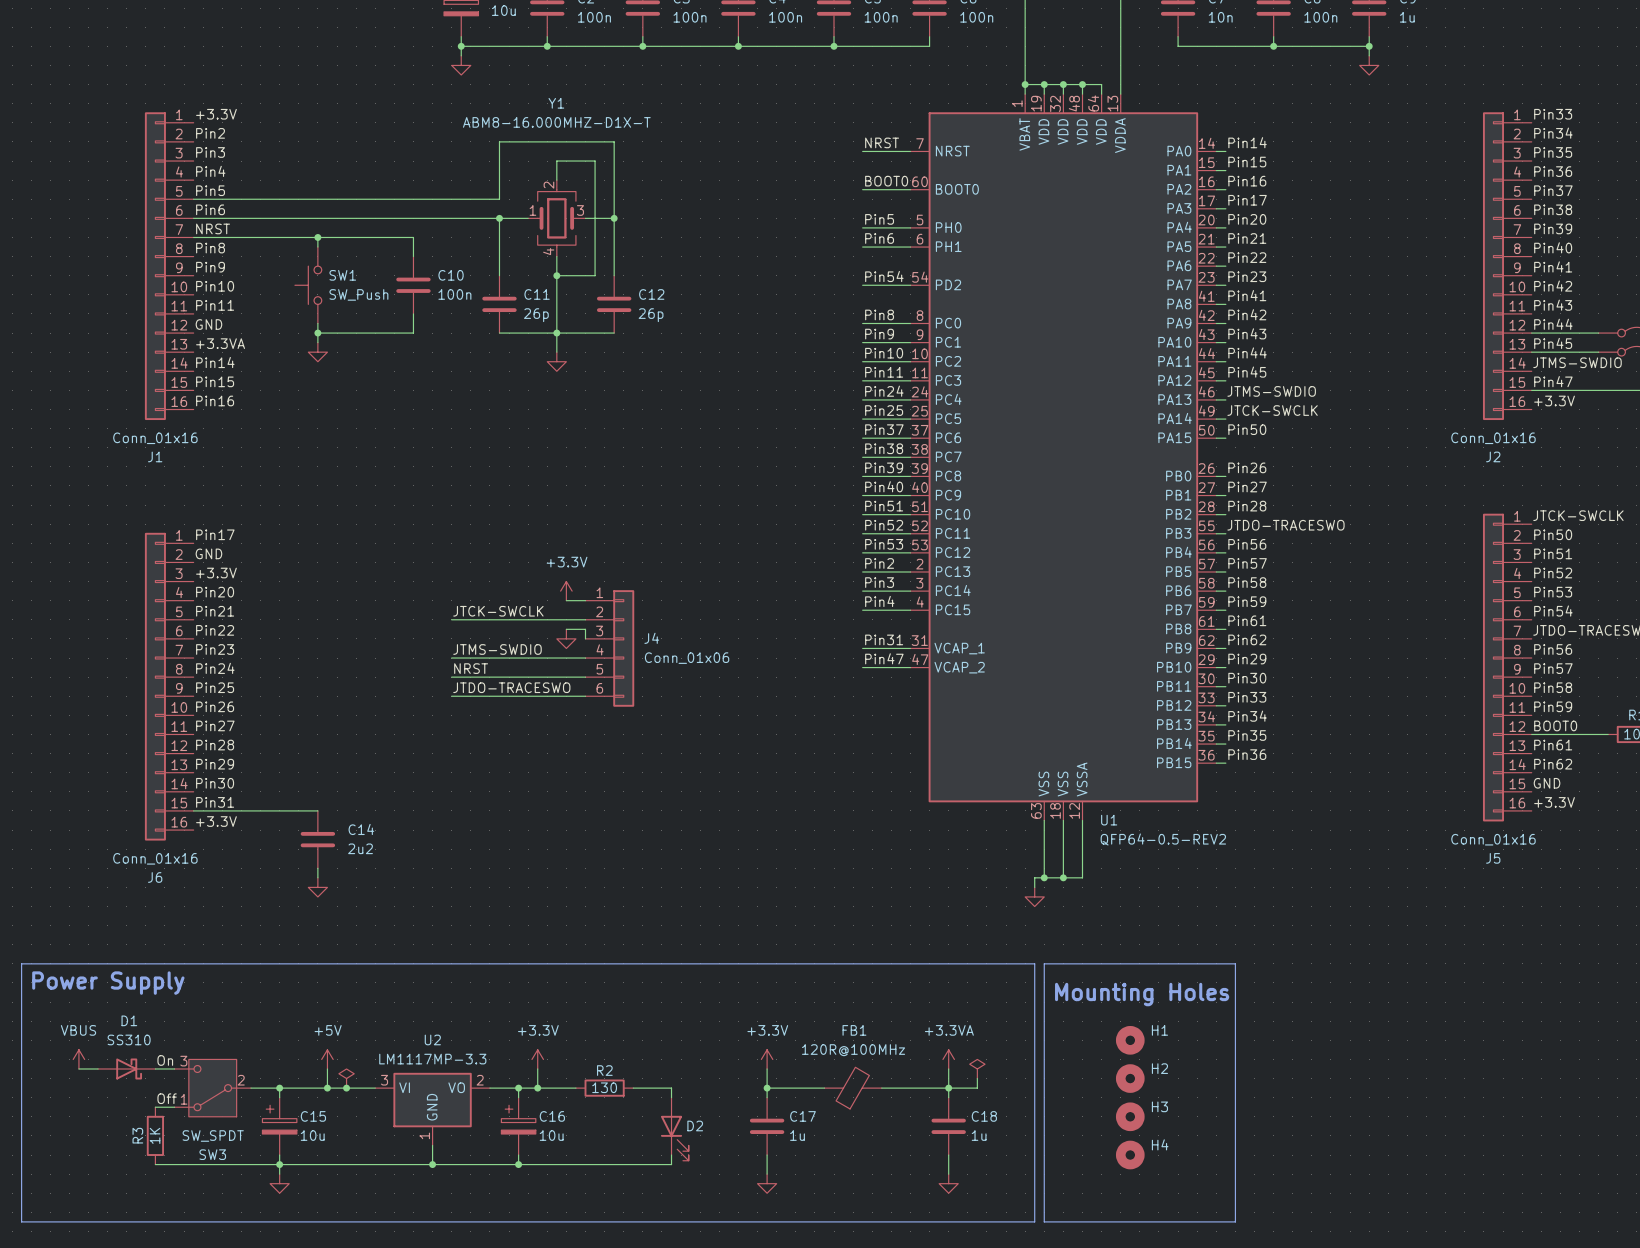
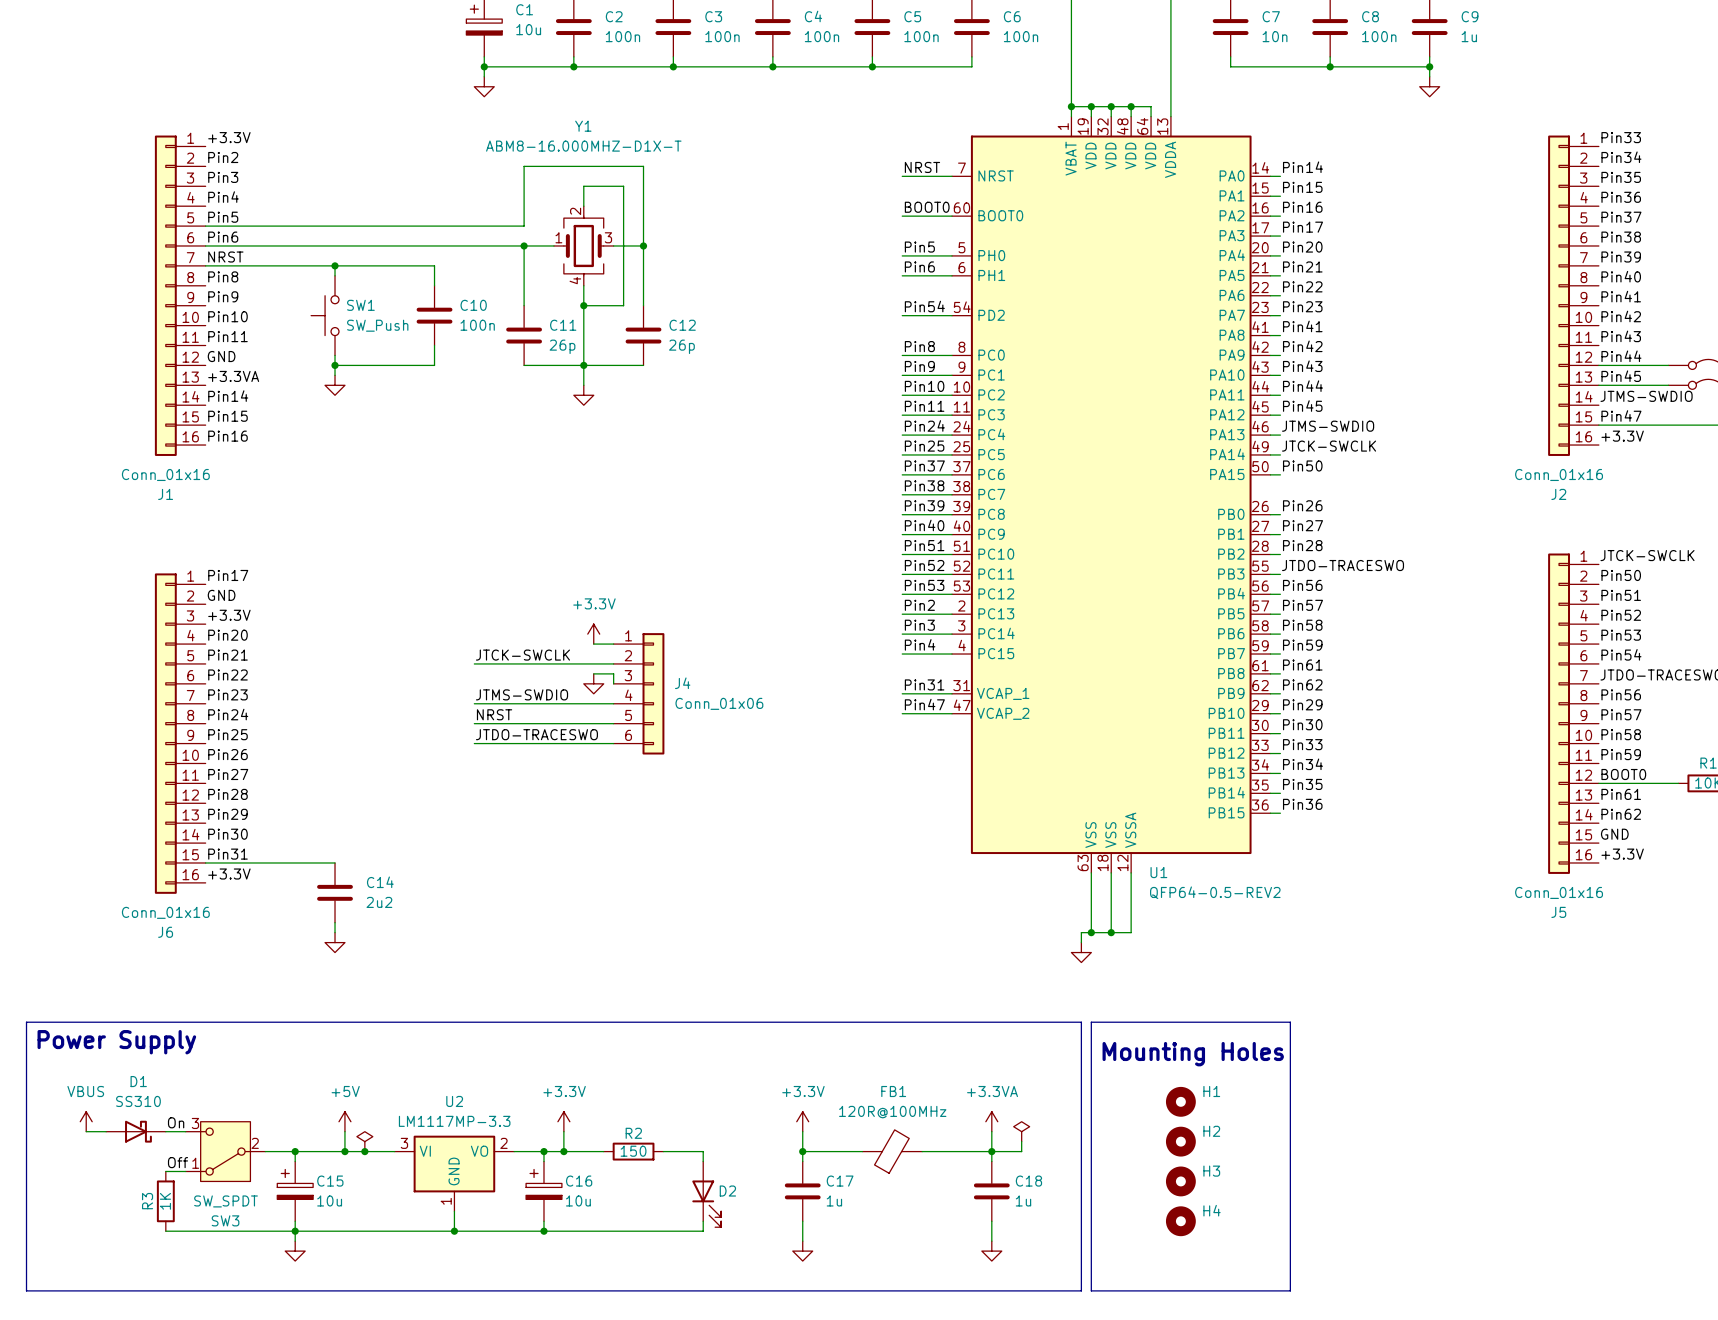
R2 value: 130 (604, 1087) -> 150 (633, 1151)

